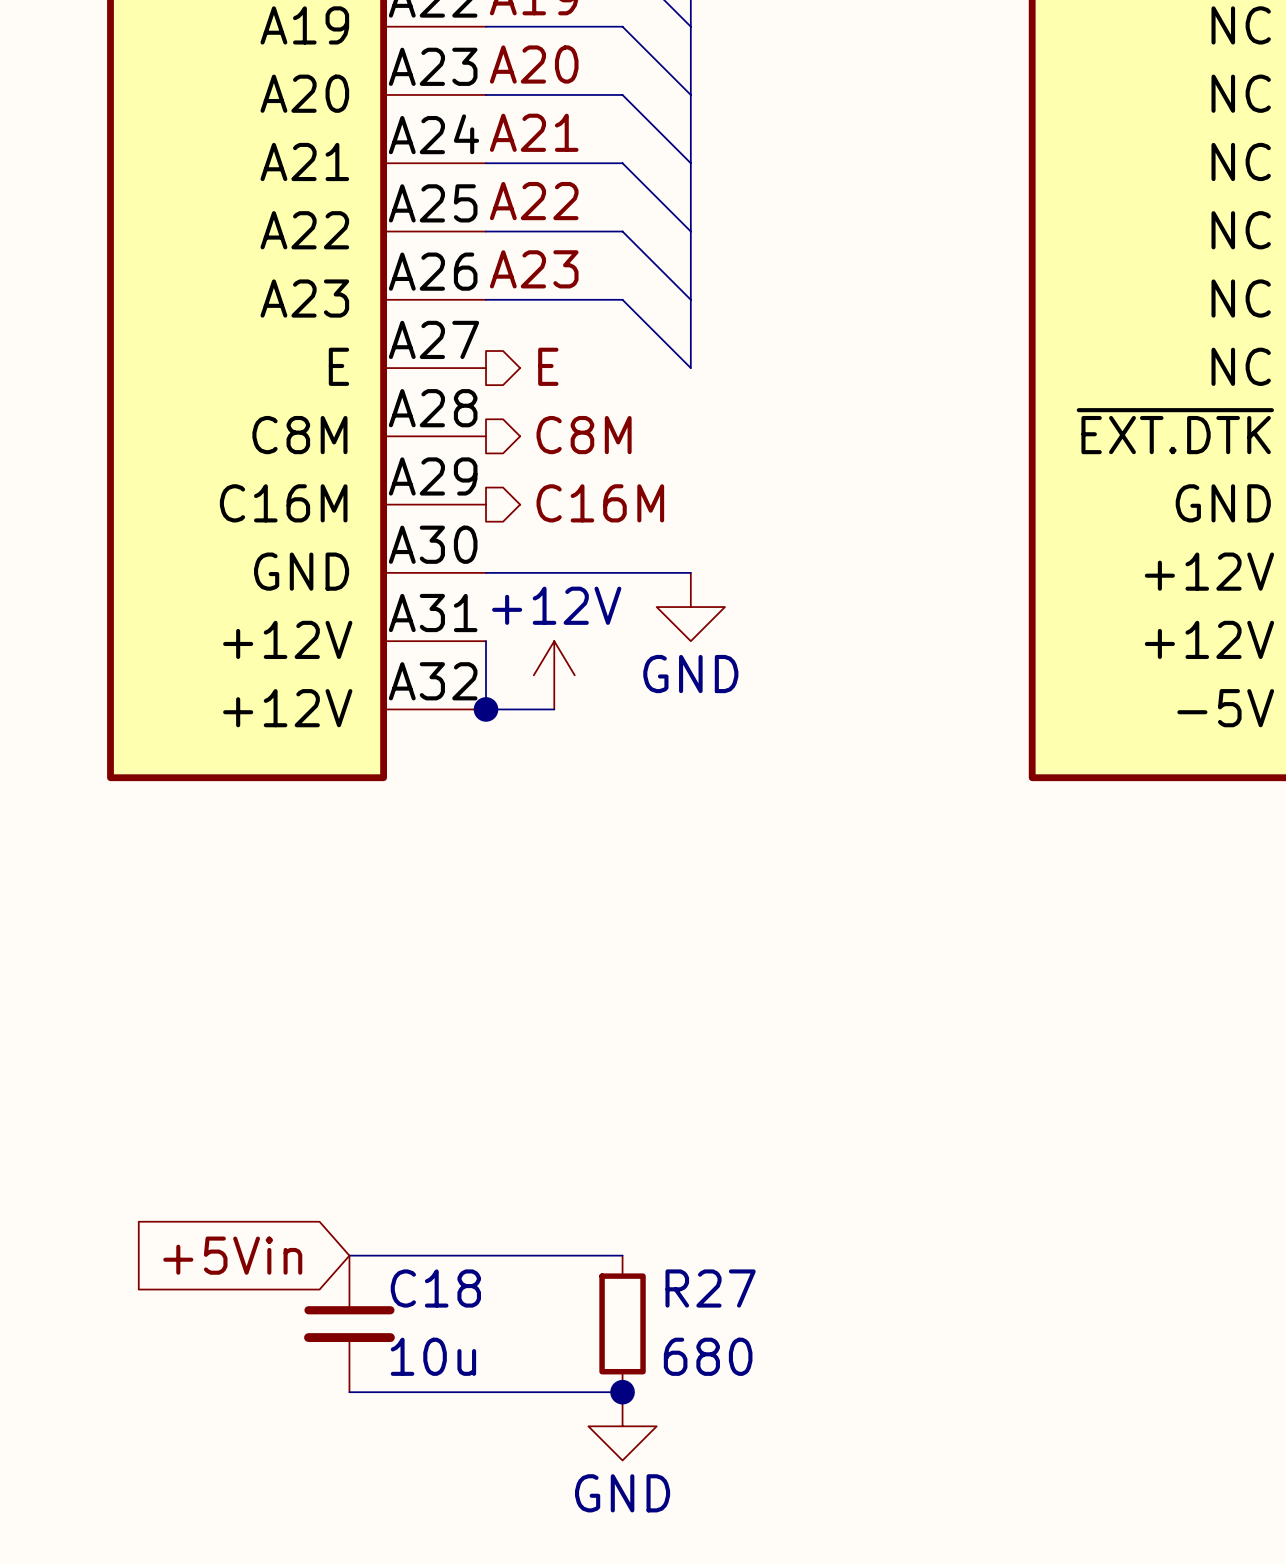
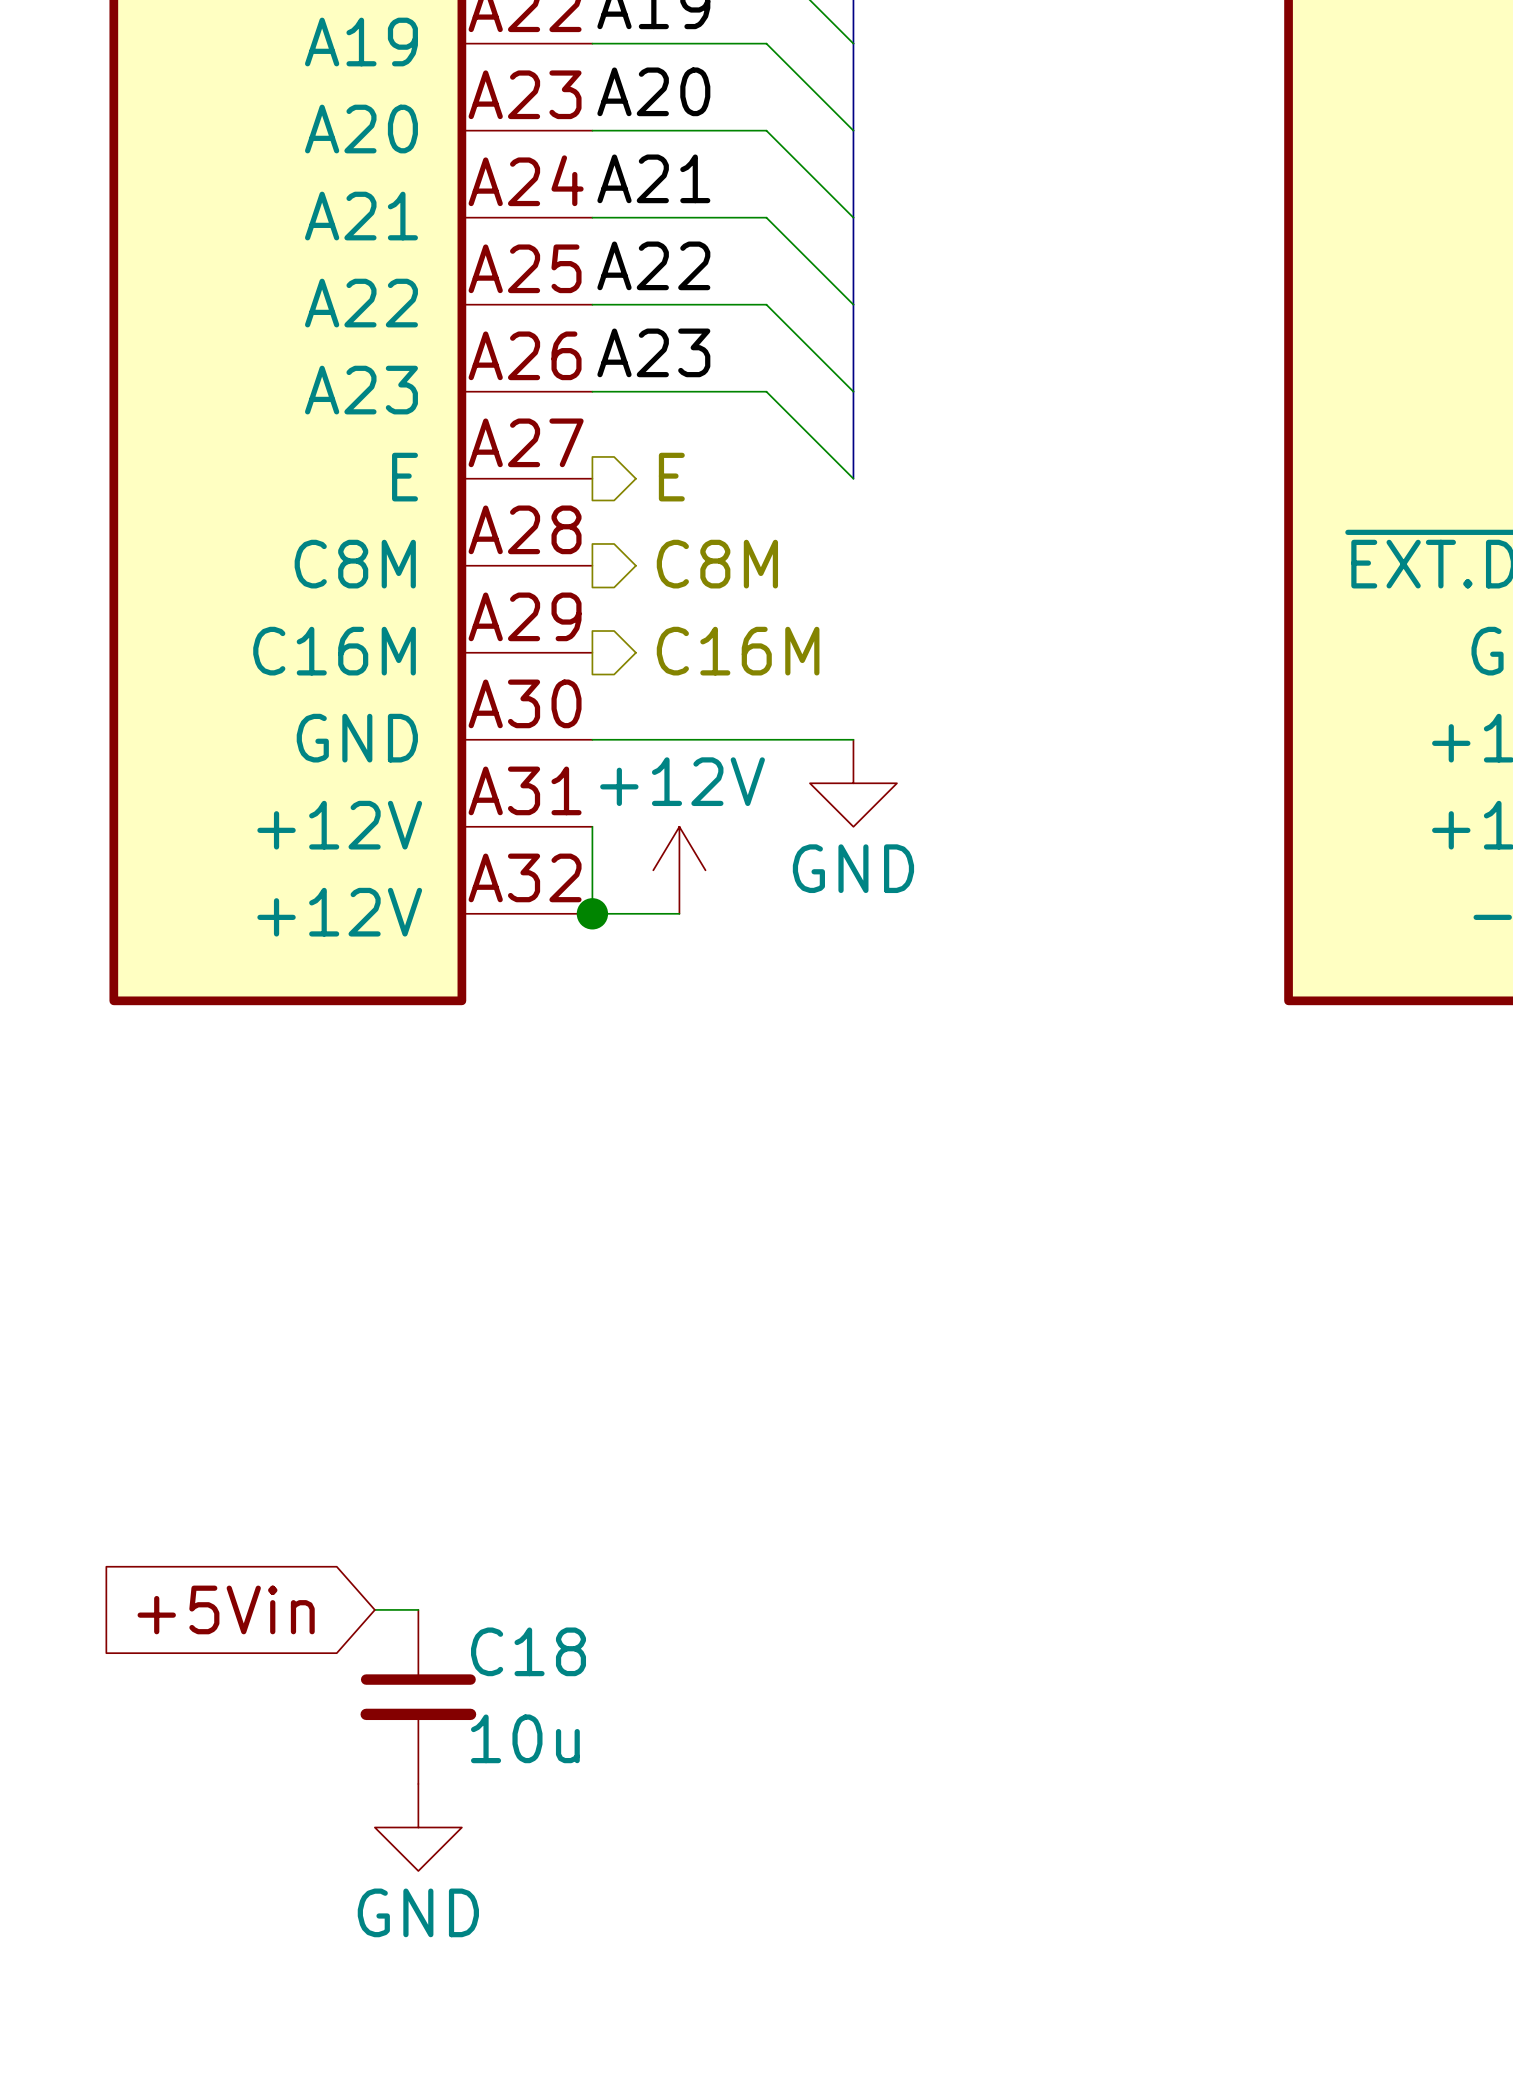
global label position: +5Vin (232, 1255) -> +5Vin (226, 1609)
wire: (349, 1255) (622, 1255) -> (418, 1609) (374, 1609)
R27: 680 (622, 1323) -> none
wire: (349, 1392) (622, 1392) -> none
junction: (622, 1392) -> none
power symbol position: GND (622, 1426) -> GND (418, 1827)

